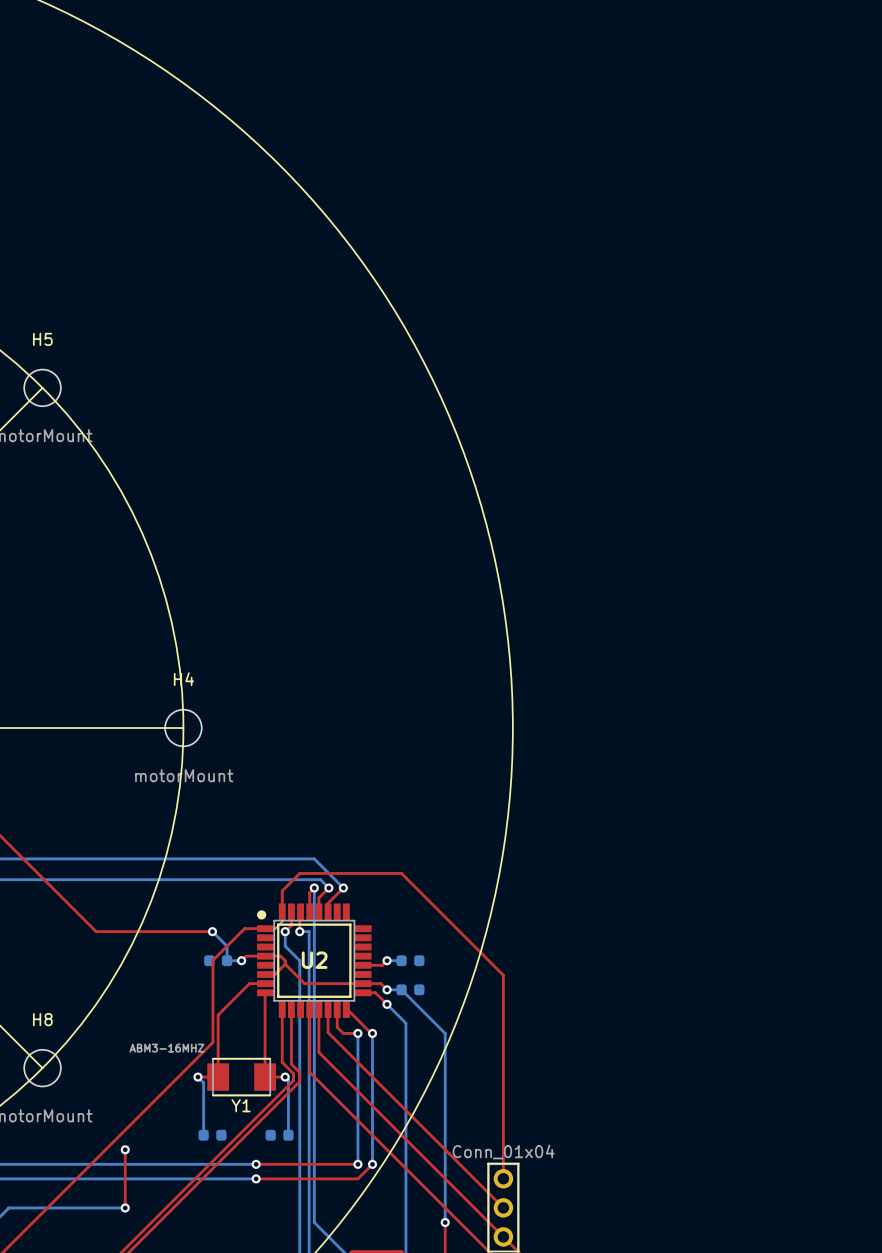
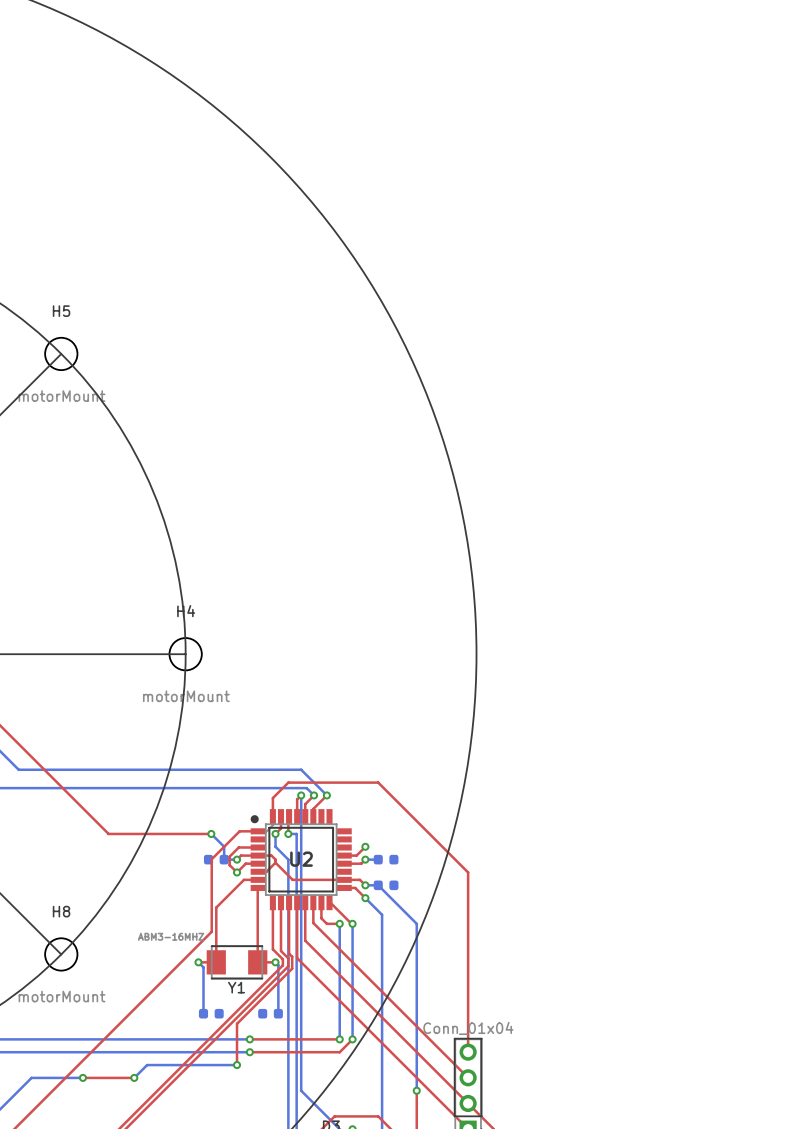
top track: none -> (258, 847) (238, 847) (229, 856) (229, 865) (237, 872) (245, 863) (258, 863)
top track: none -> (365, 846) (356, 855) (344, 855)
via: none -> (365, 846)
via: none -> (237, 872)
top track: none -> (289, 902) (289, 953) (292, 956) (292, 968) (237, 1023) (237, 1065)
top track: (125, 1149) (125, 1207) -> (82, 1077) (134, 1077)
via: (125, 1149) -> none
via: none -> (237, 1065)
bottom track: (67, 1207) (125, 1207) -> (237, 1065) (147, 1065) (134, 1077)
via: none -> (82, 1077)

